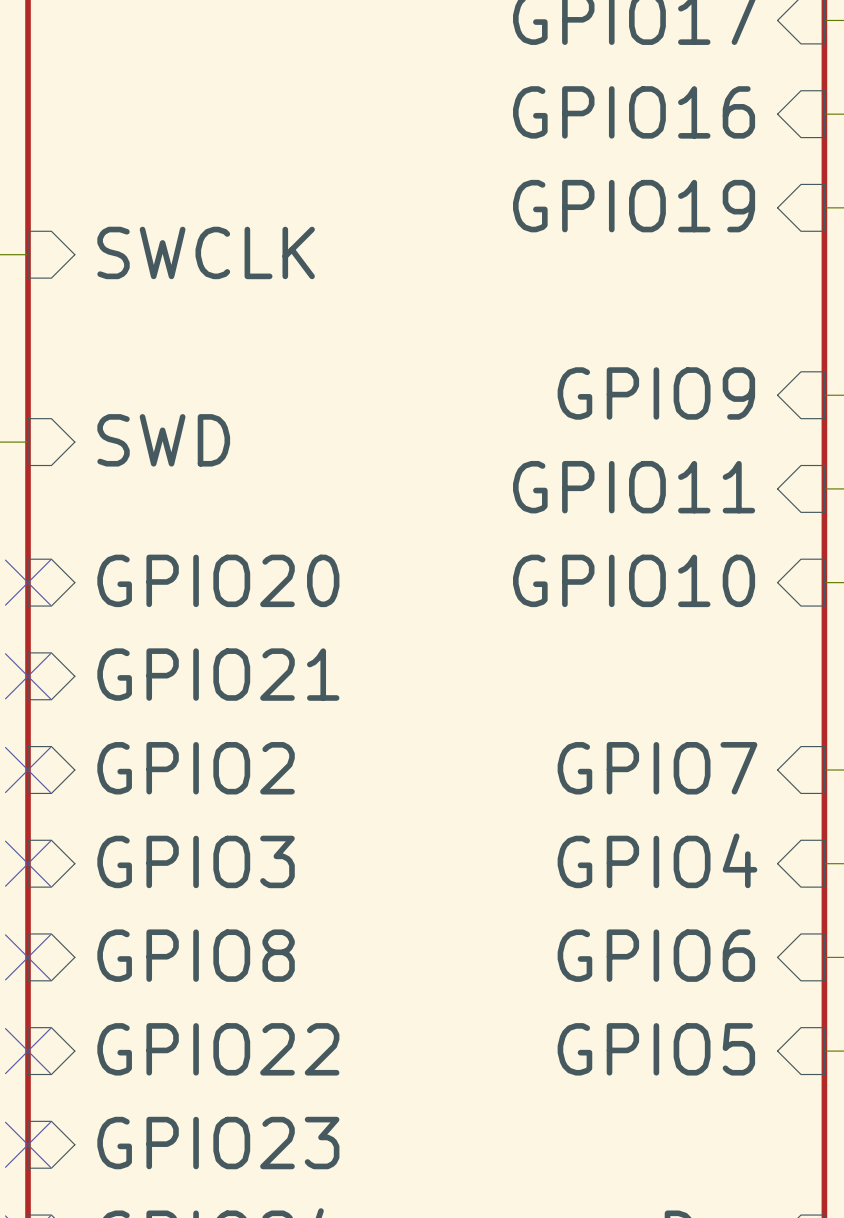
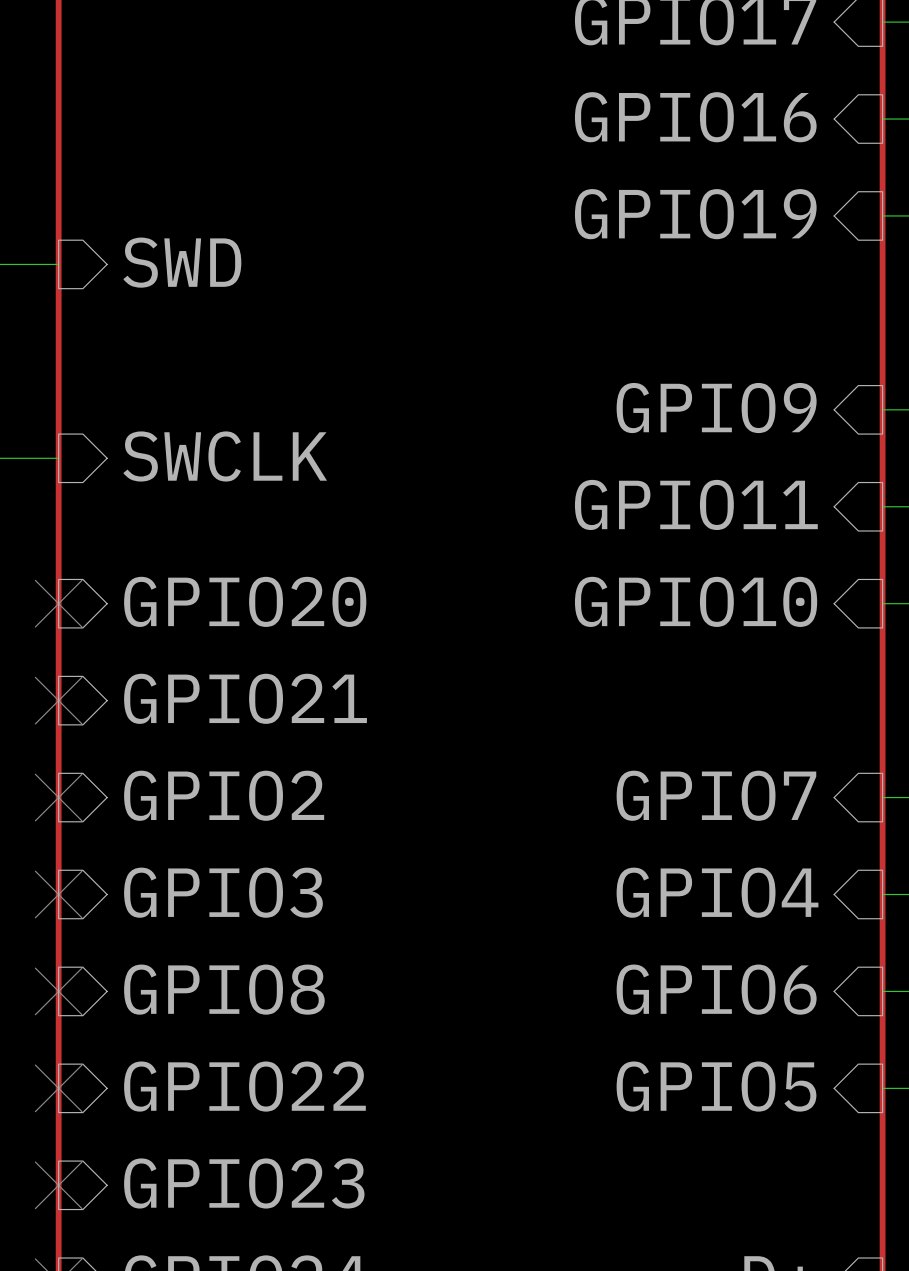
sheet pin: SWCLK (206, 252) -> SWD (182, 262)
sheet pin: SWD (163, 440) -> SWCLK (225, 456)

